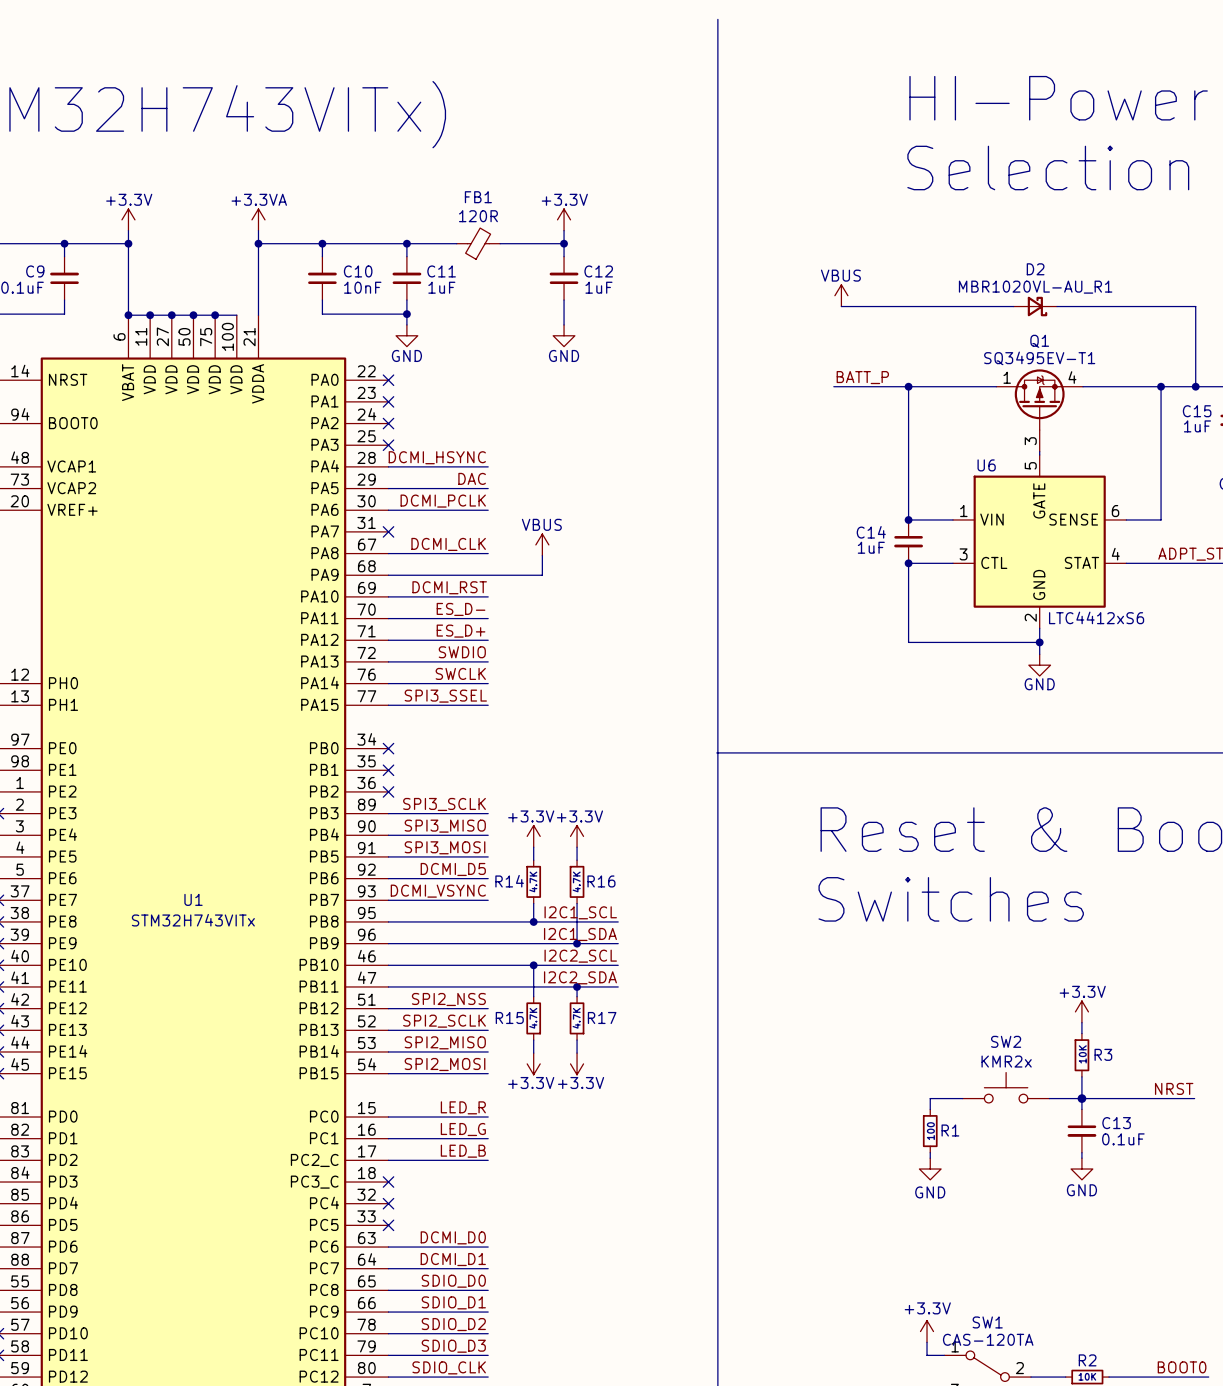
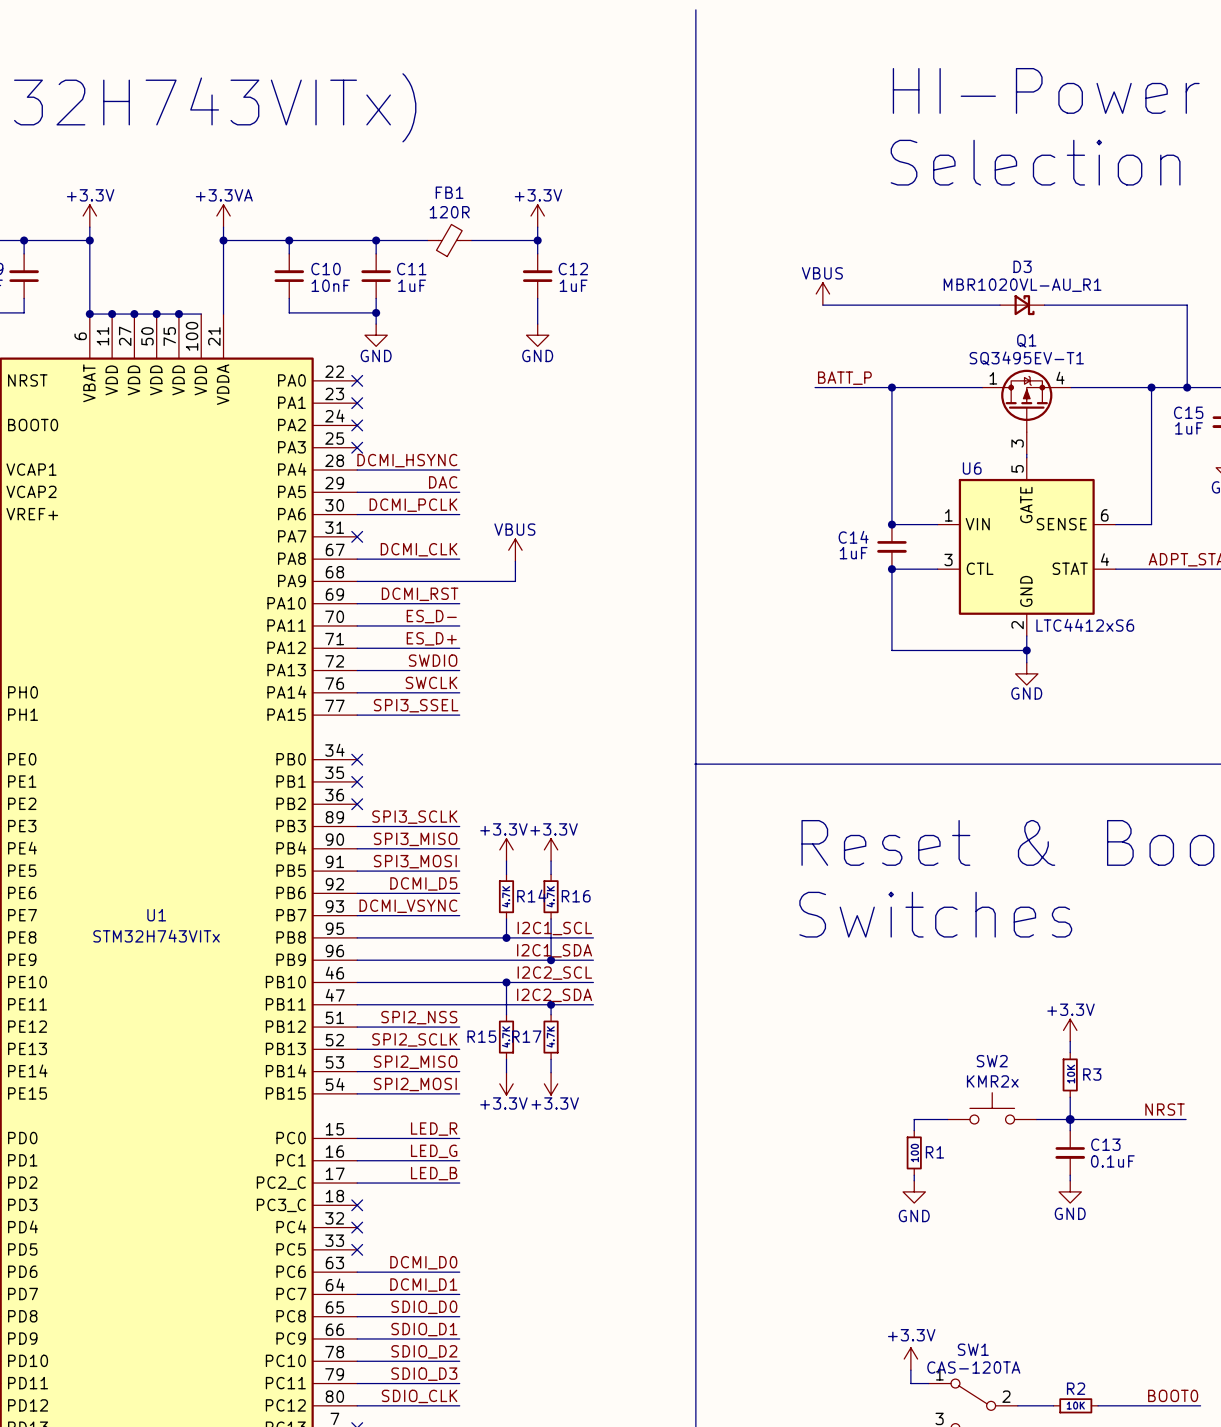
D2 name: D2 (1035, 269) -> D3 (1022, 266)
R14 name position: R14 (509, 881) -> R14 (531, 896)
R17 name position: R17 (602, 1017) -> R17 (526, 1036)

